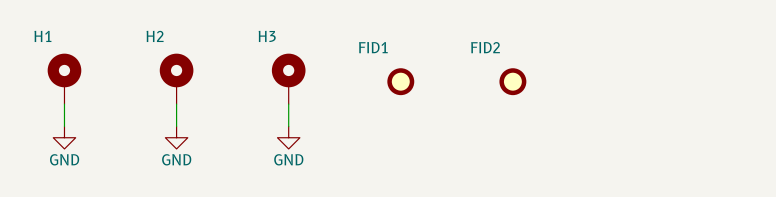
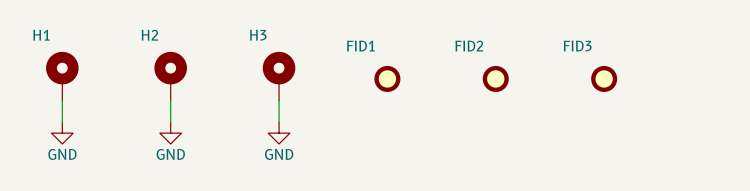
FID3: none -> (604, 78)

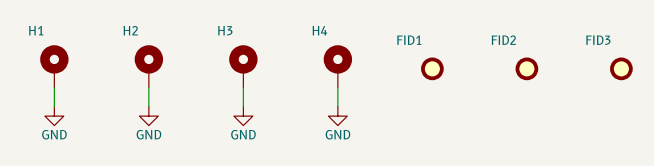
FID2 name: FID2 (469, 46) -> FID1 (409, 40)
FID3 name: FID3 (577, 46) -> FID2 (503, 40)
H4: none -> (337, 66)
FID1: (387, 78) -> none
FID3: none -> (621, 68)
wire: none -> (337, 87) (337, 106)
power symbol: none -> GND (337, 116)

